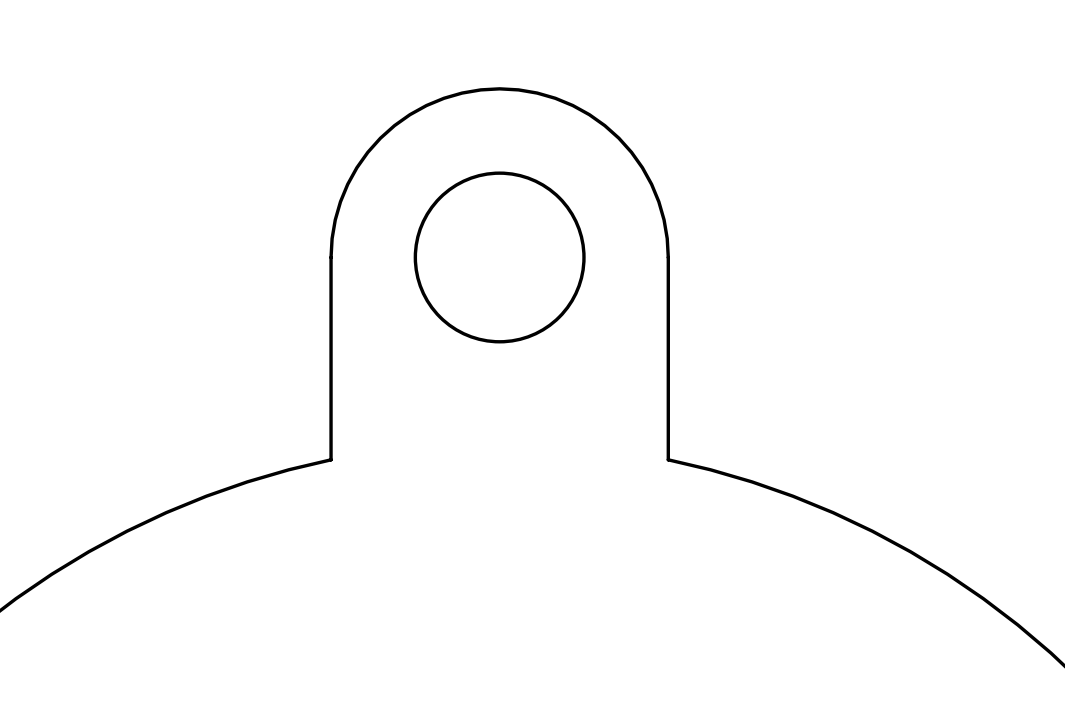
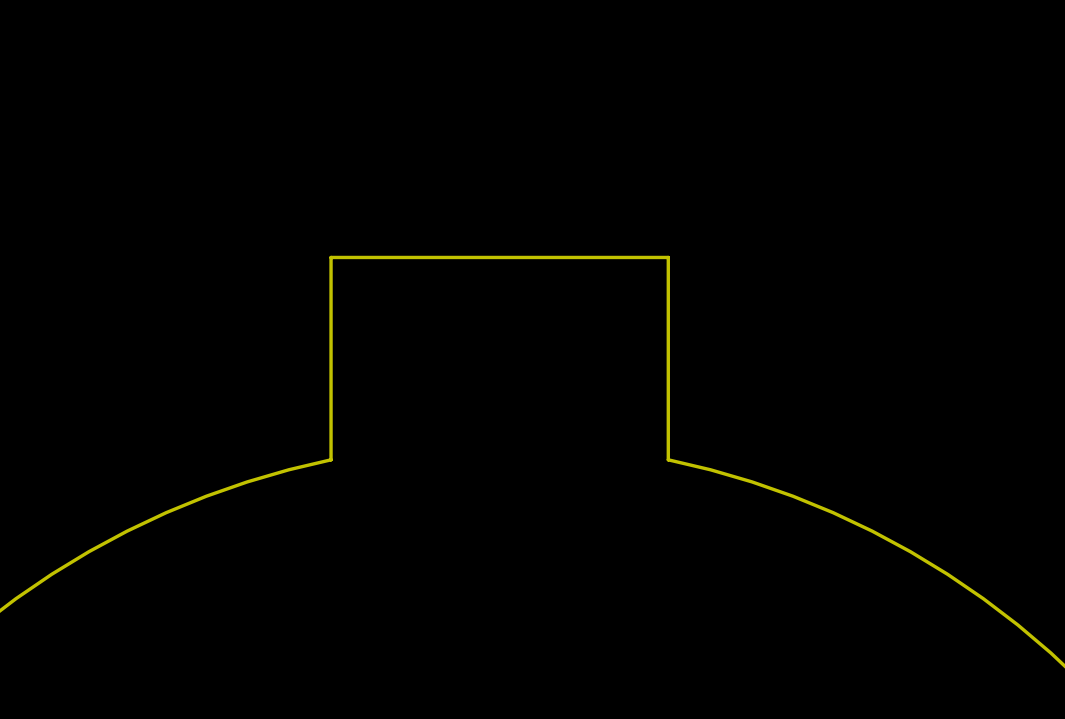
round board edge: [413, 171, 586, 344] -> none
board edge: (668, 257) (664, 219) (651, 184) (642, 167) (618, 138) (589, 114) (555, 98) (518, 89) (499, 88) (462, 93) (443, 98) (409, 114) (380, 138) (356, 167) (340, 201) (332, 238) (331, 257) -> (668, 257) (331, 257)

